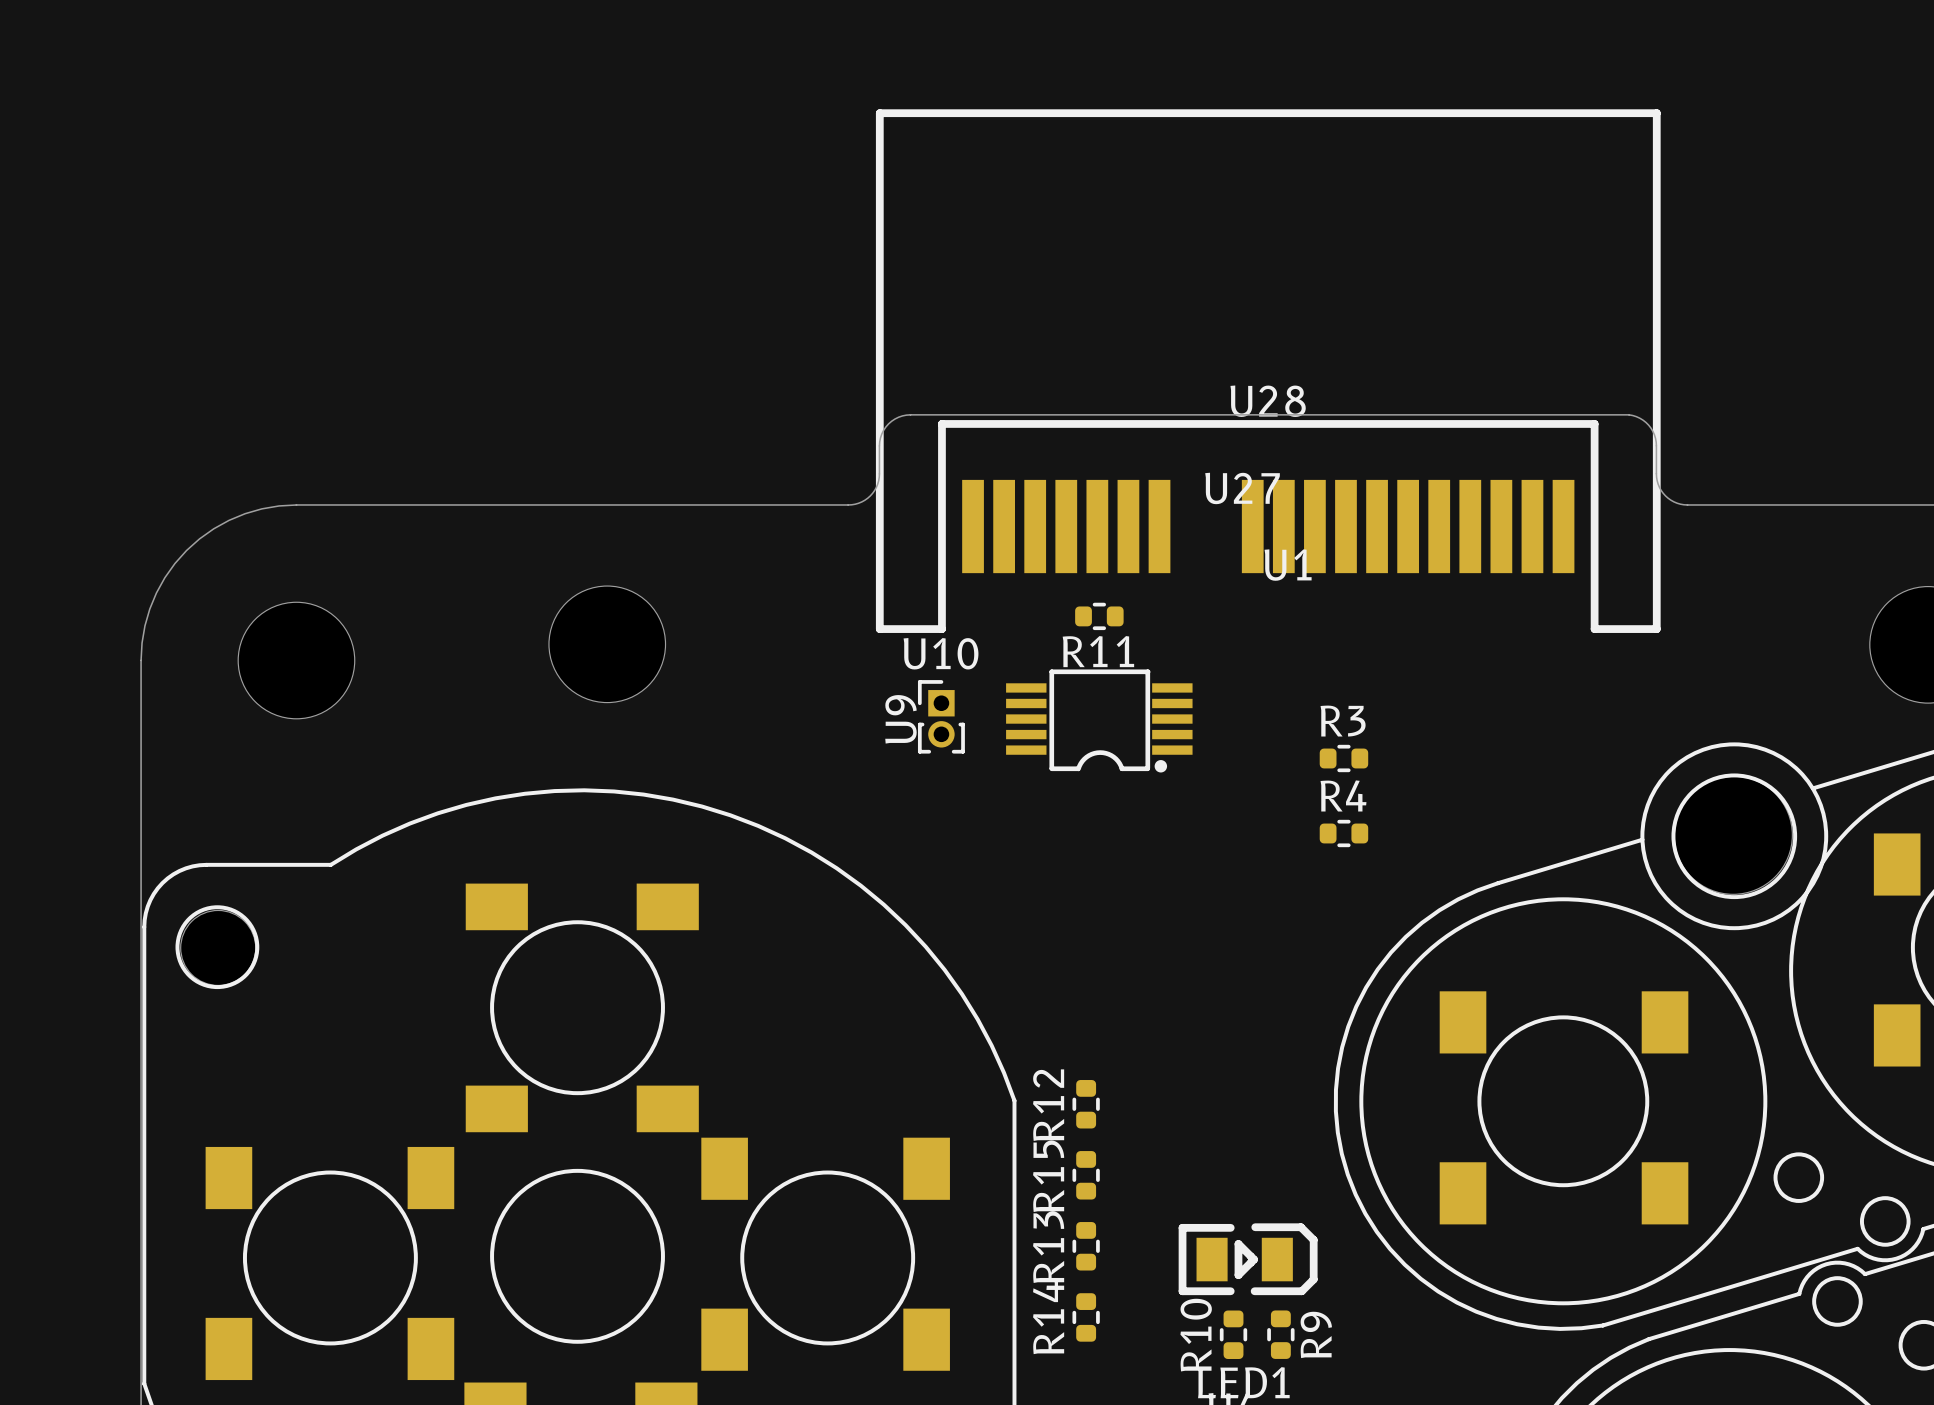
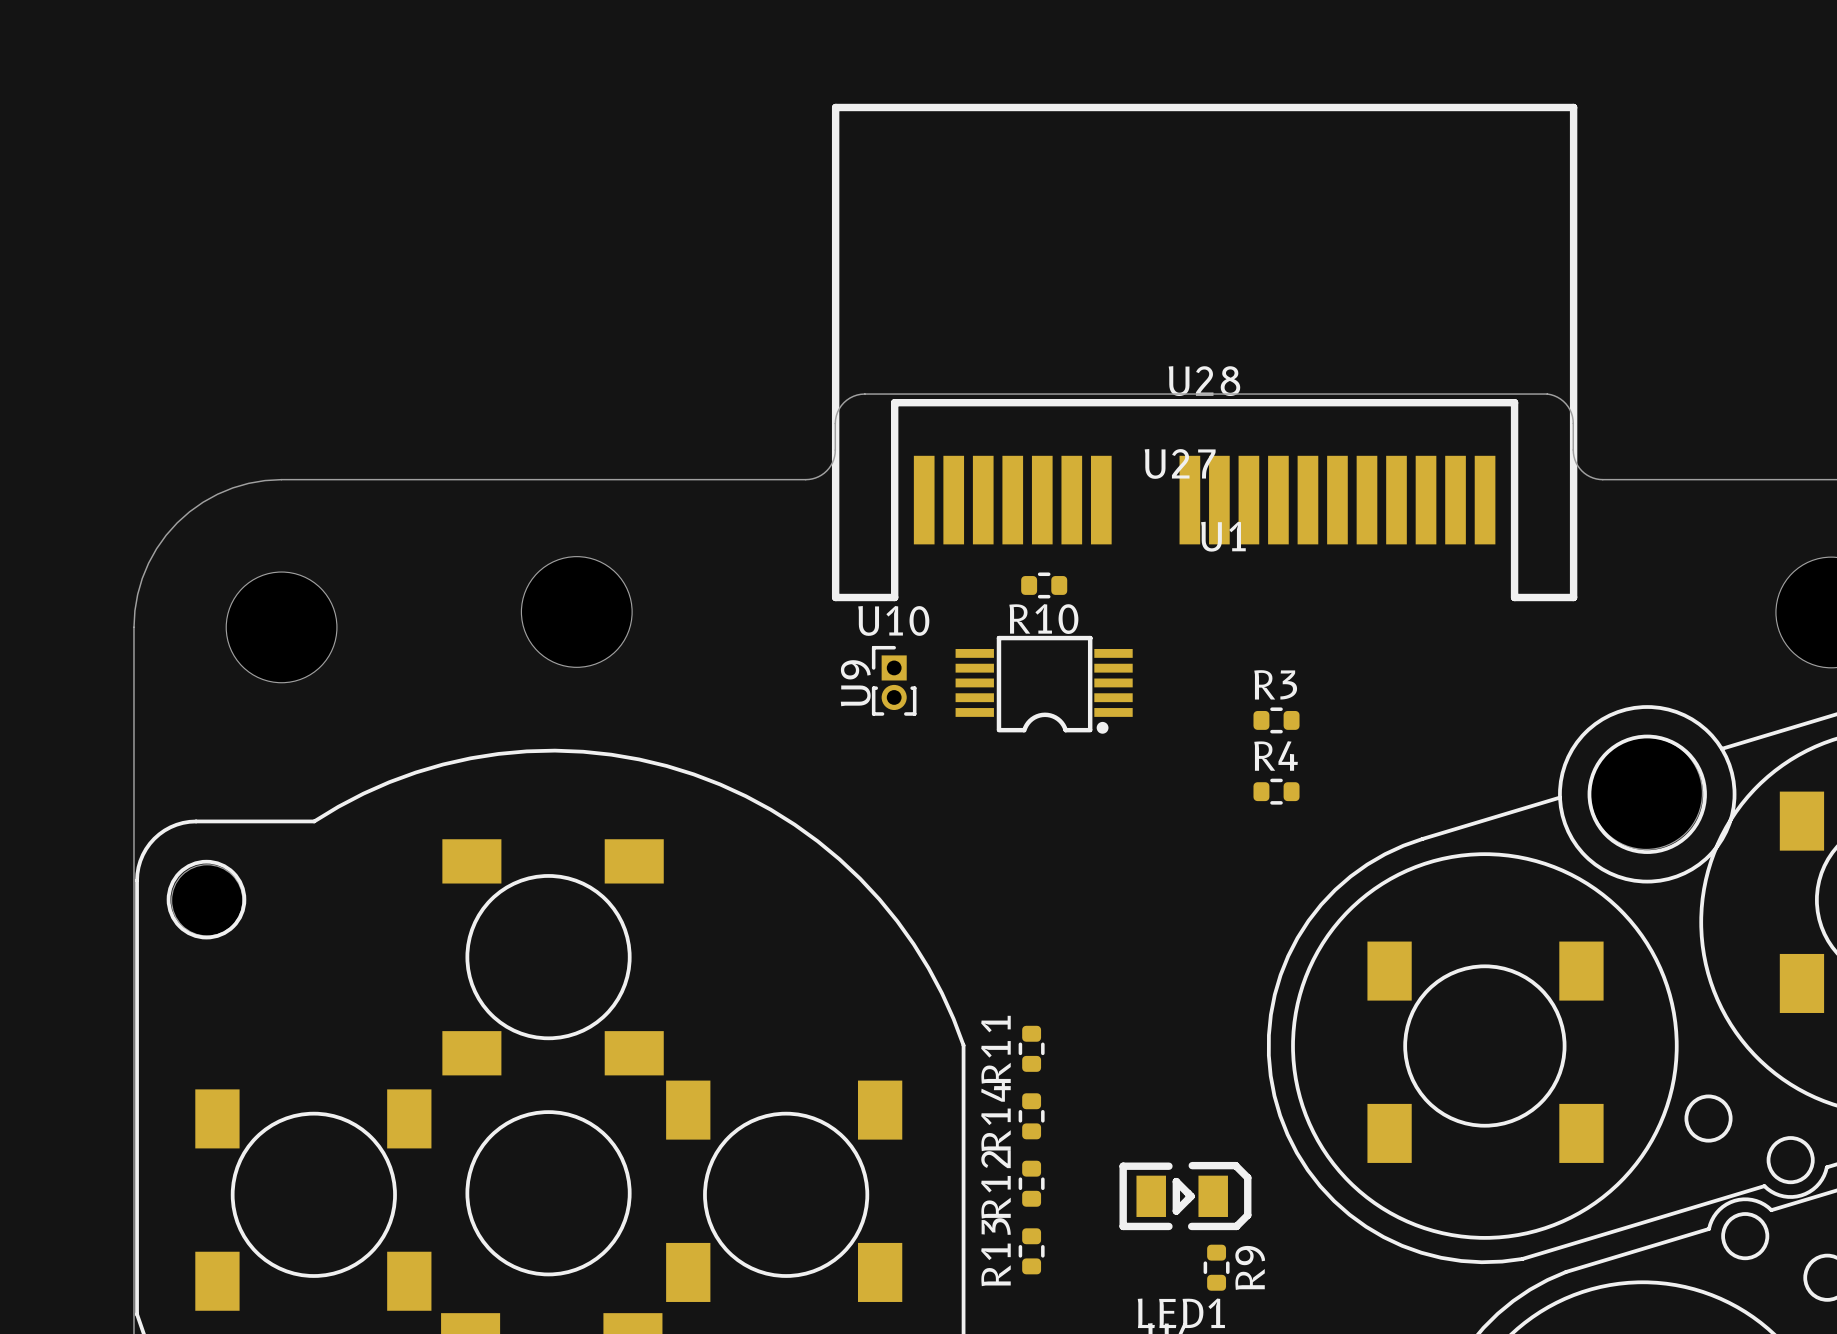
R11 name: R11 (1098, 651) -> R10 (1043, 619)
R12 name: R12 (1048, 1105) -> R11 (995, 1049)
R15 name: R15 (1048, 1176) -> R14 (995, 1116)
R13 name: R13 (1048, 1247) -> R12 (995, 1184)
R14 name: R14 (1048, 1317) -> R13 (995, 1252)
R10: (1233, 1334) -> none

